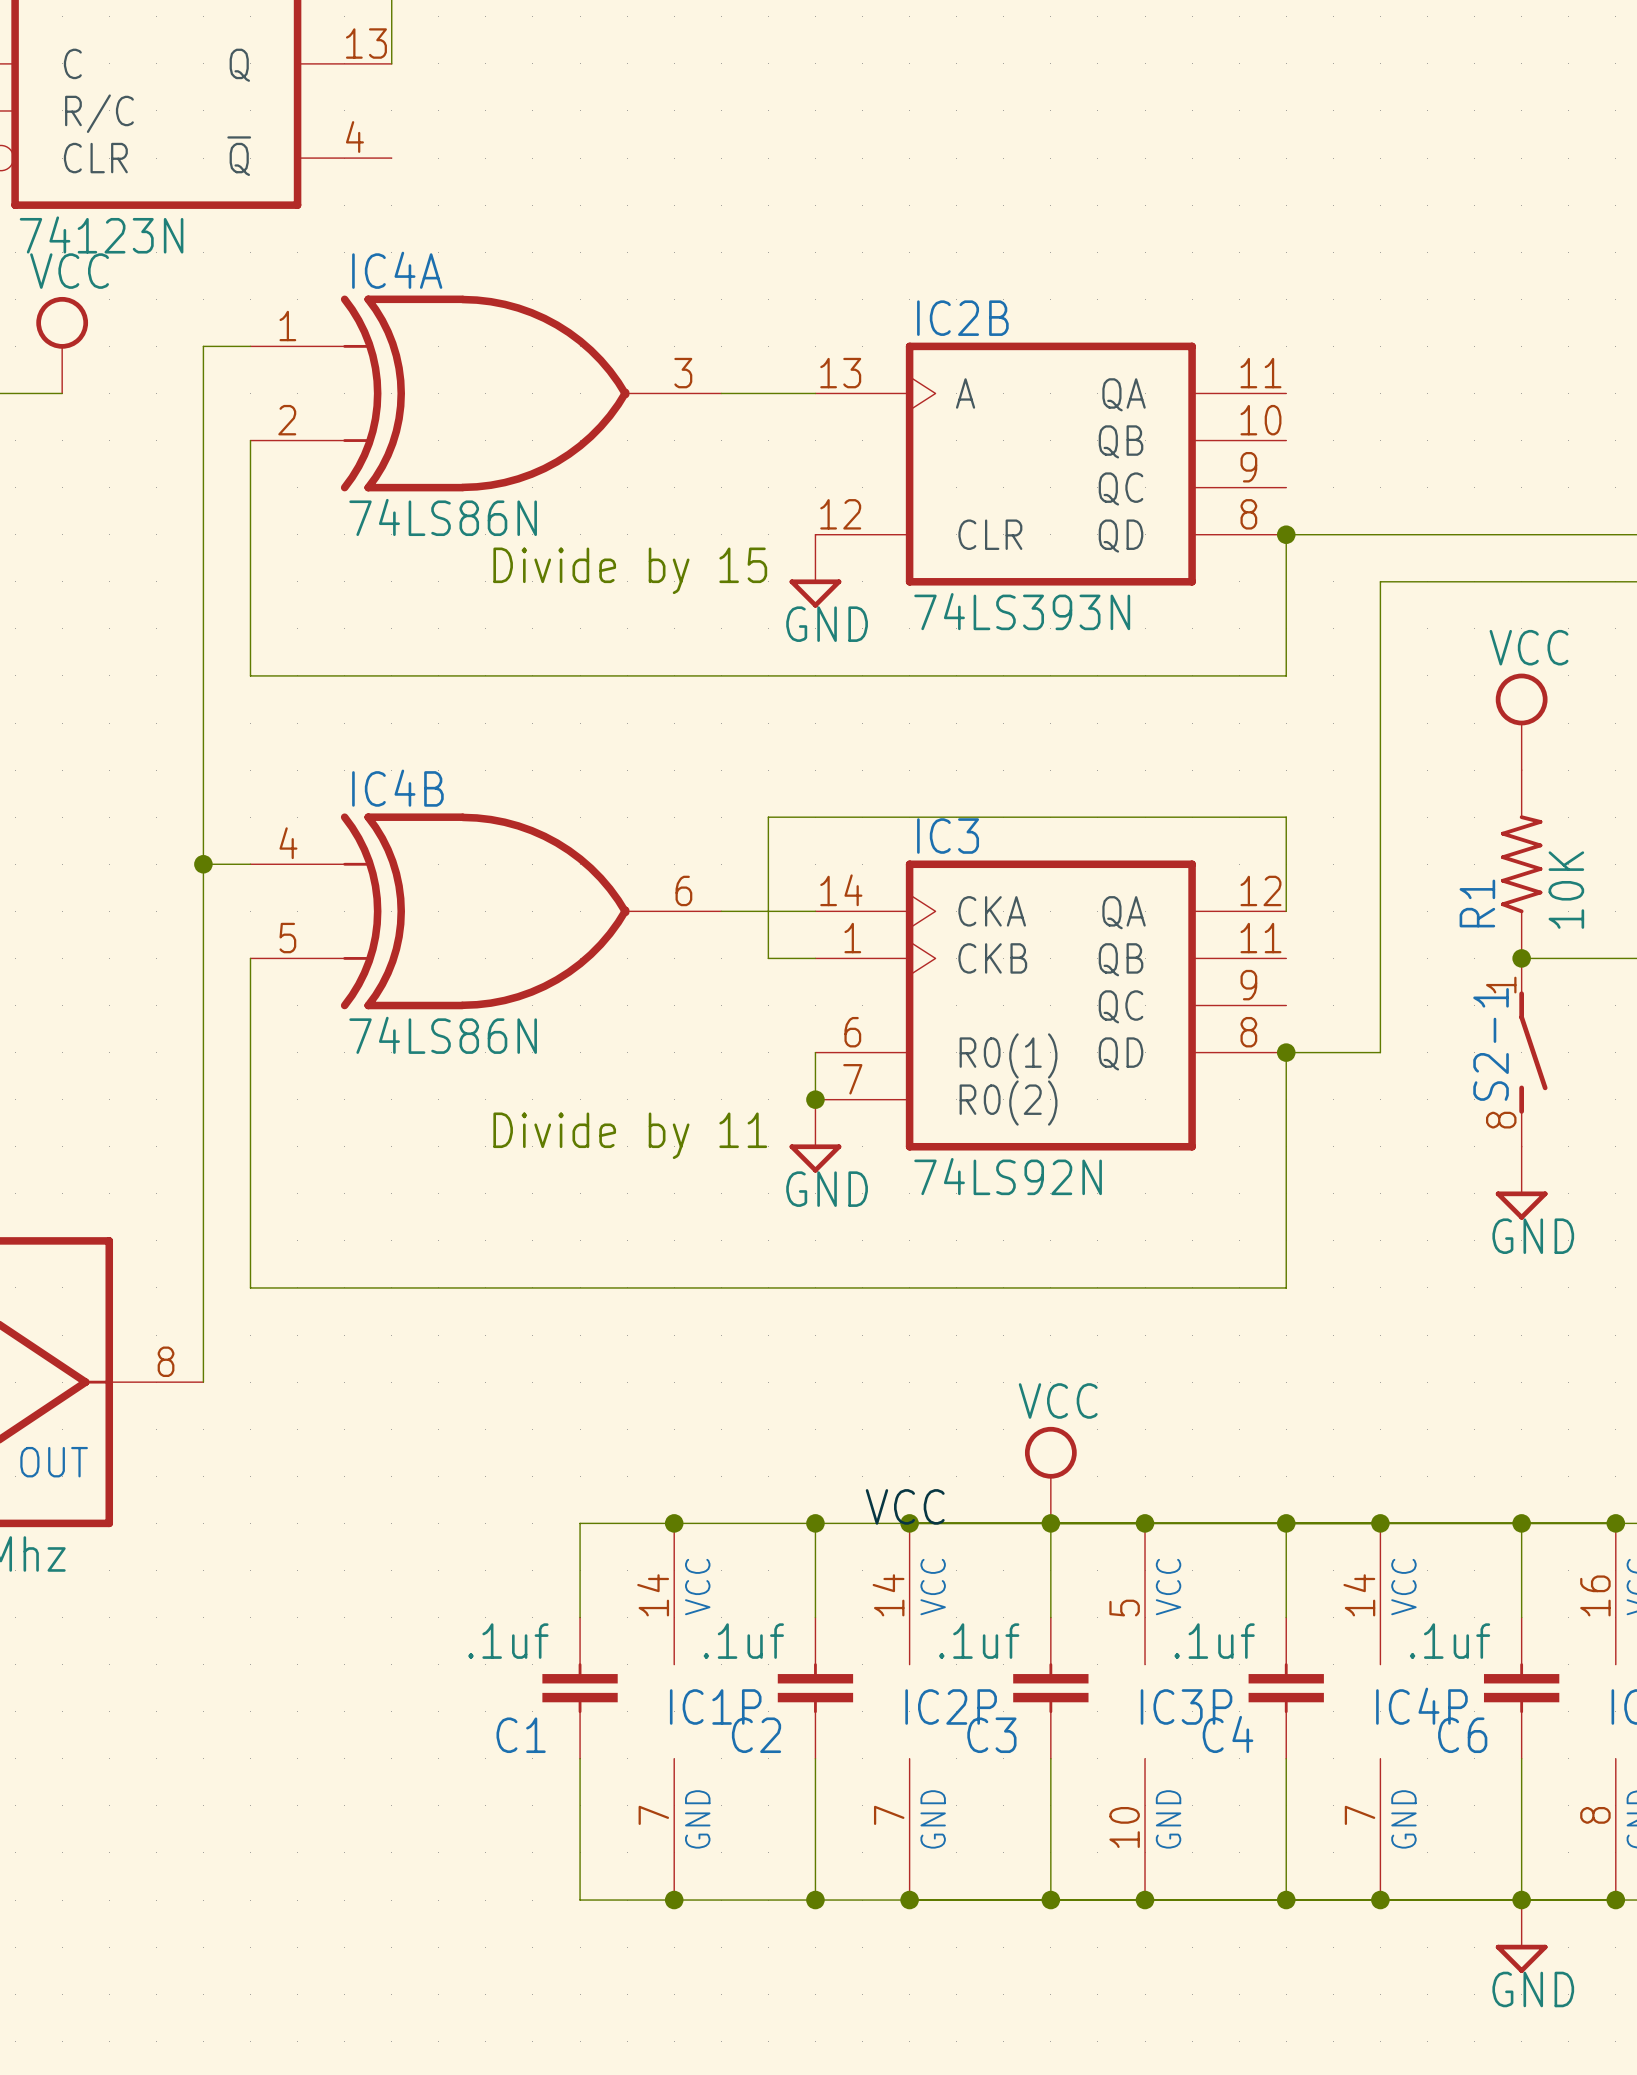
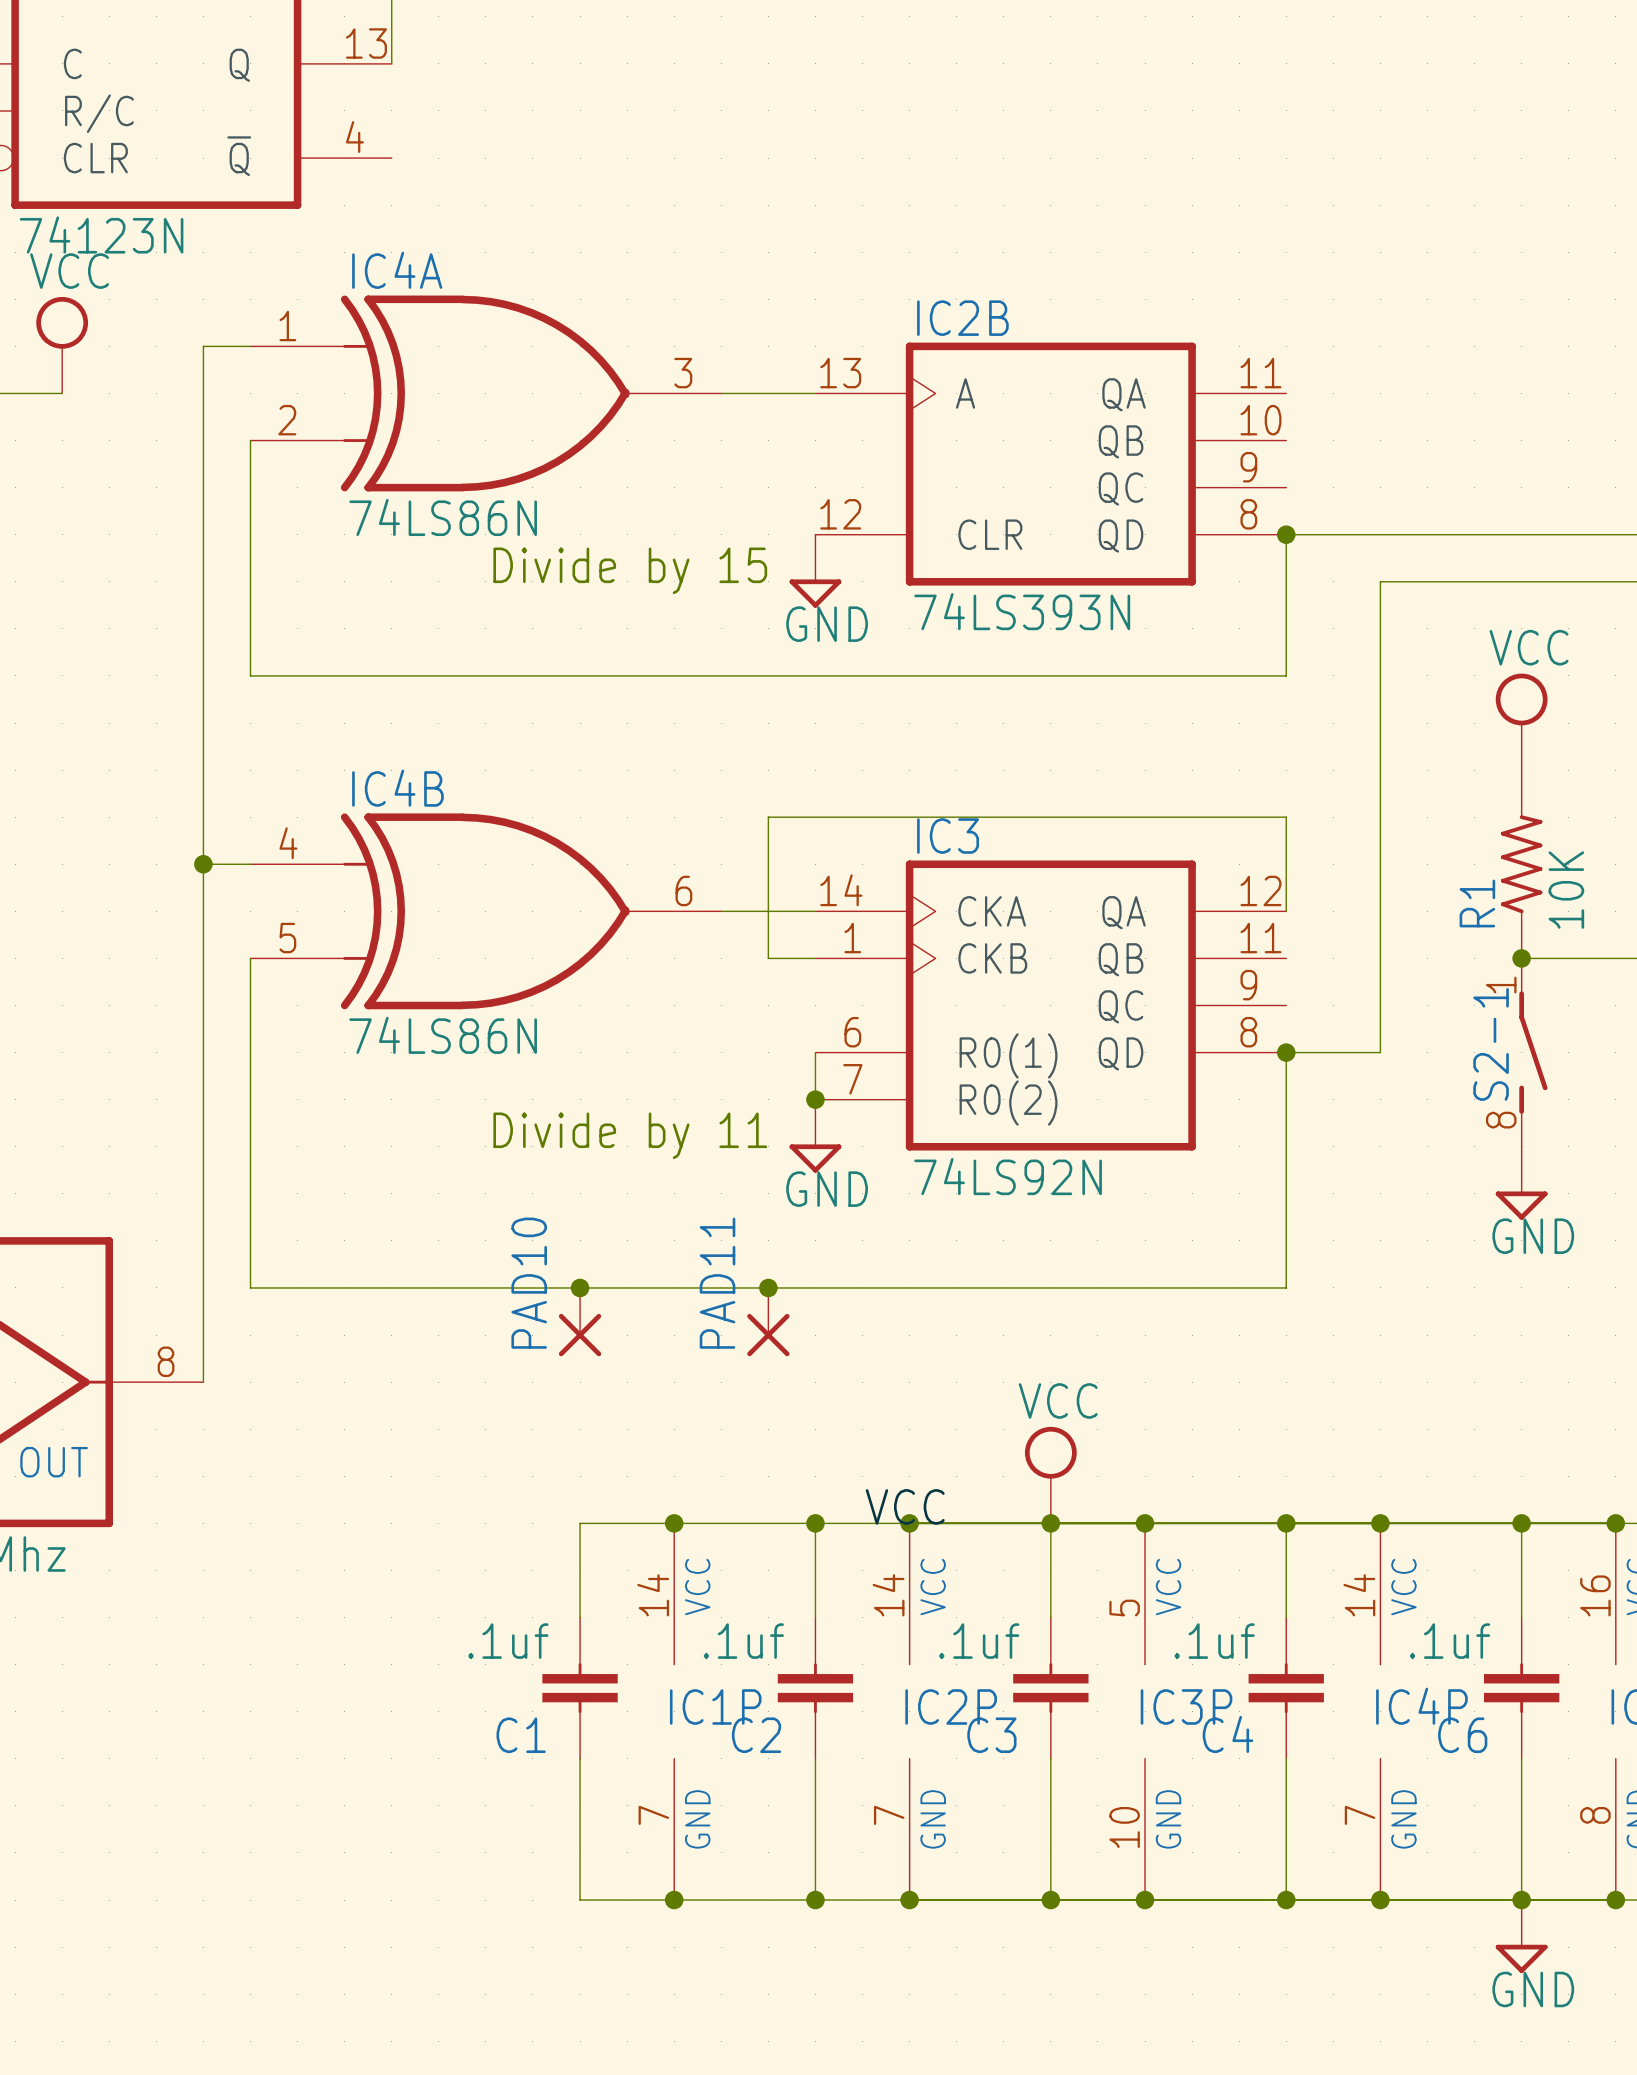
junction: none -> (580, 1287)
junction: none -> (768, 1287)
PAD10: none -> (580, 1322)
PAD11: none -> (768, 1322)

